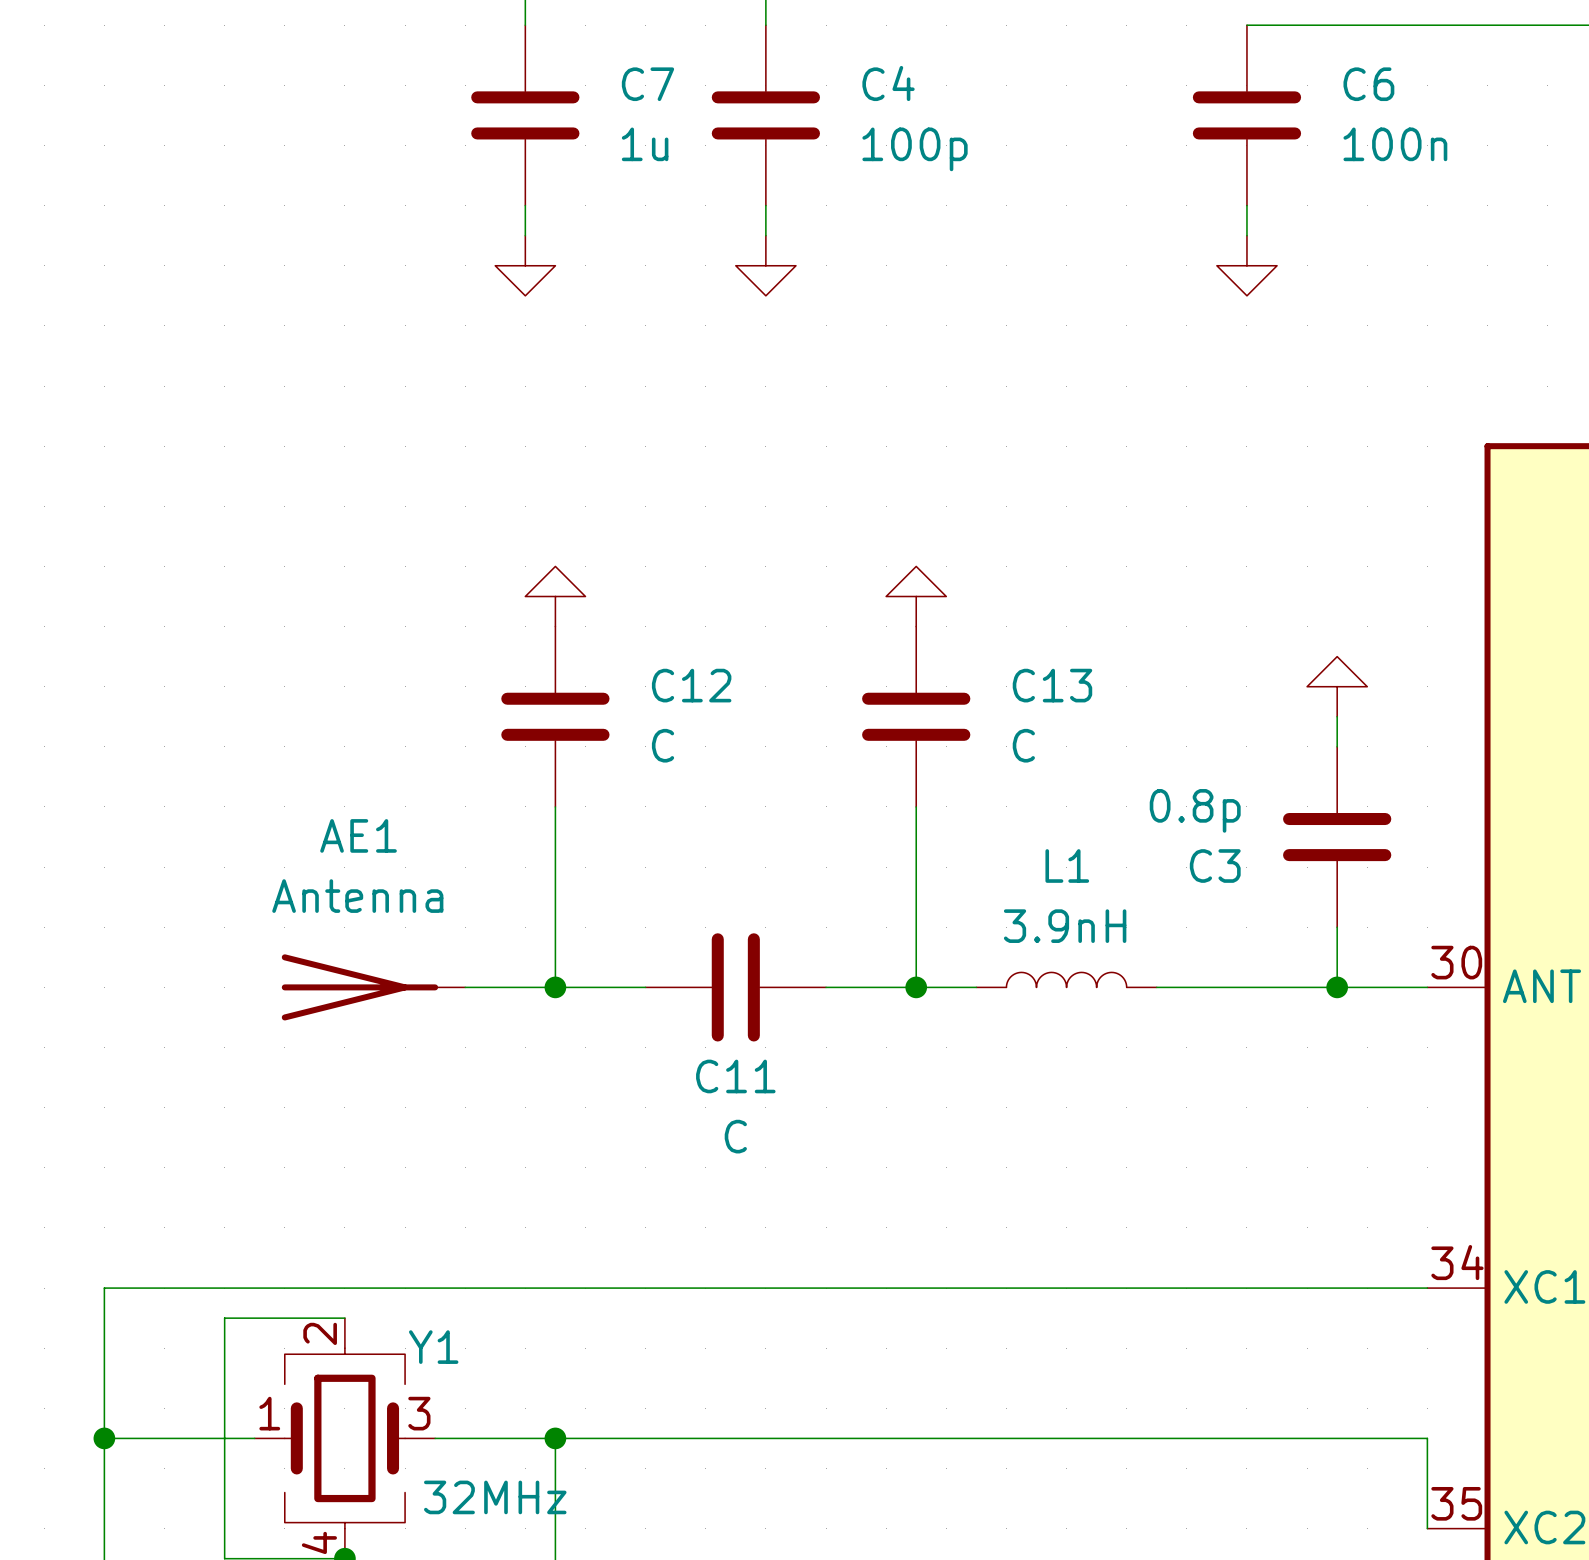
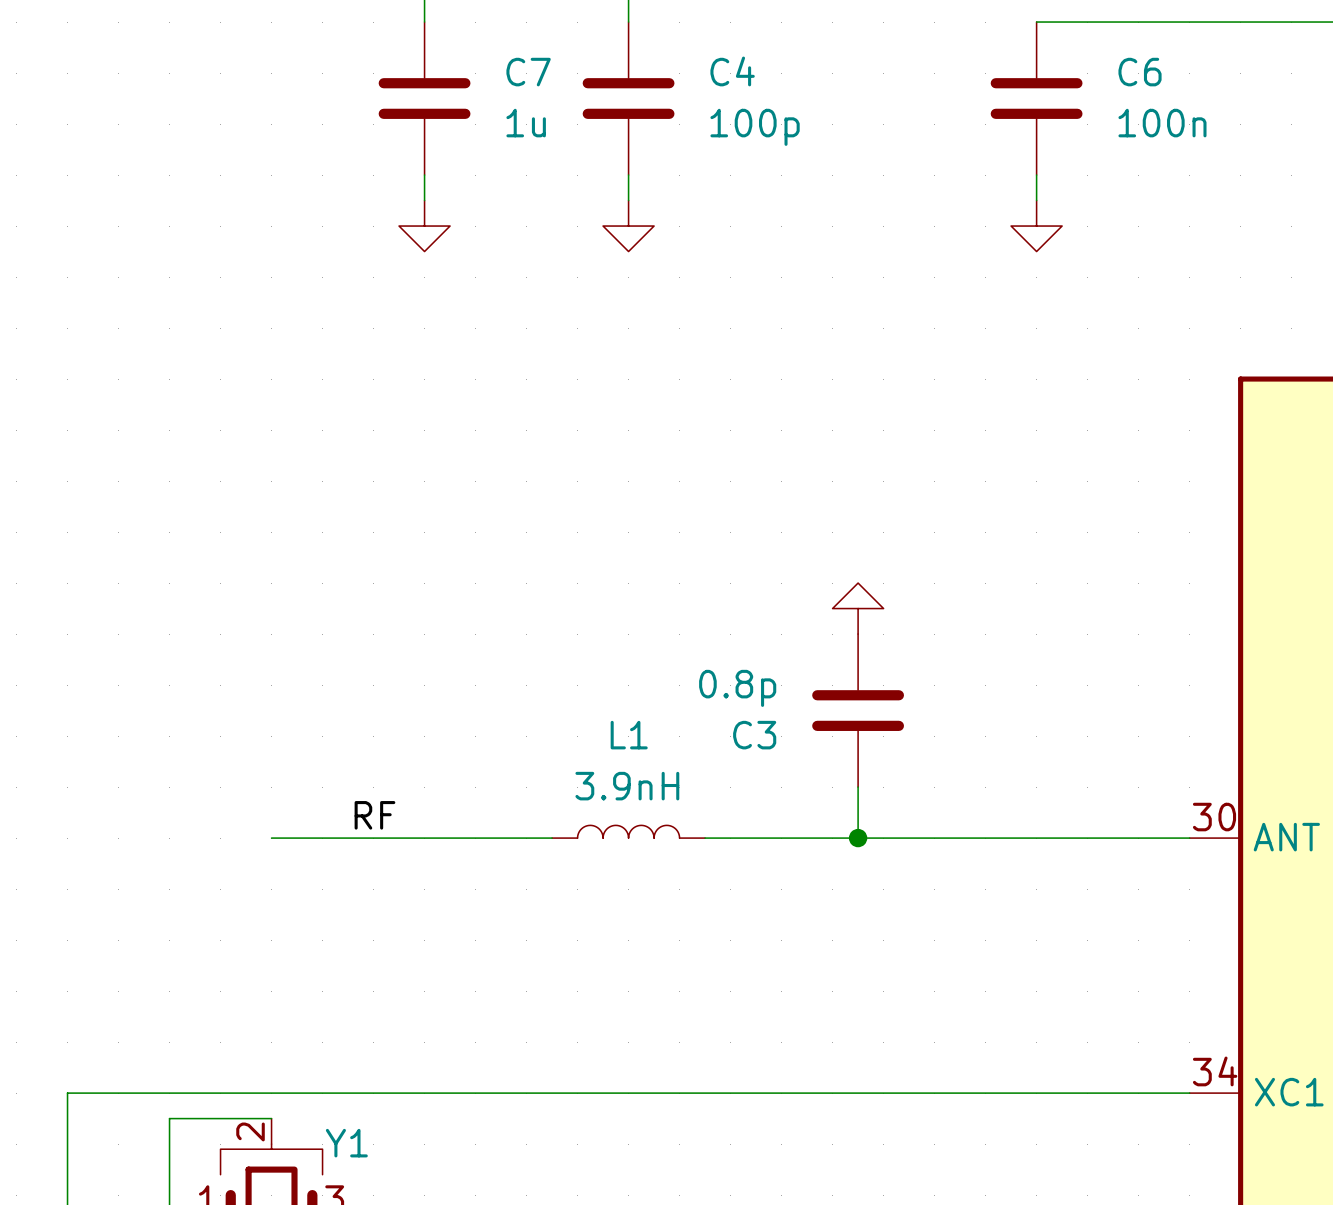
power symbol: (555, 596) -> none
power symbol: (916, 596) -> none
power symbol: (1337, 686) -> none
C12: C (555, 716) -> none
C13: C (916, 716) -> none
power symbol: none -> (858, 608)
wire: (1337, 716) (1337, 746) -> none
wire: (555, 806) (555, 987) -> none
wire: (916, 806) (916, 987) -> none
C3 position: (1337, 837) -> (858, 710)
wire: (1337, 927) (1337, 987) -> (858, 787) (858, 838)
label: none -> RF (374, 815)
L1 position: (1066, 979) -> (628, 831)
AE1: Antenna (373, 987) -> none
junction: (555, 987) -> none
C11: C (735, 987) -> none
junction position: (916, 987) -> (858, 838)
wire: none -> (807, 838) (960, 838)
junction: (1337, 987) -> none

